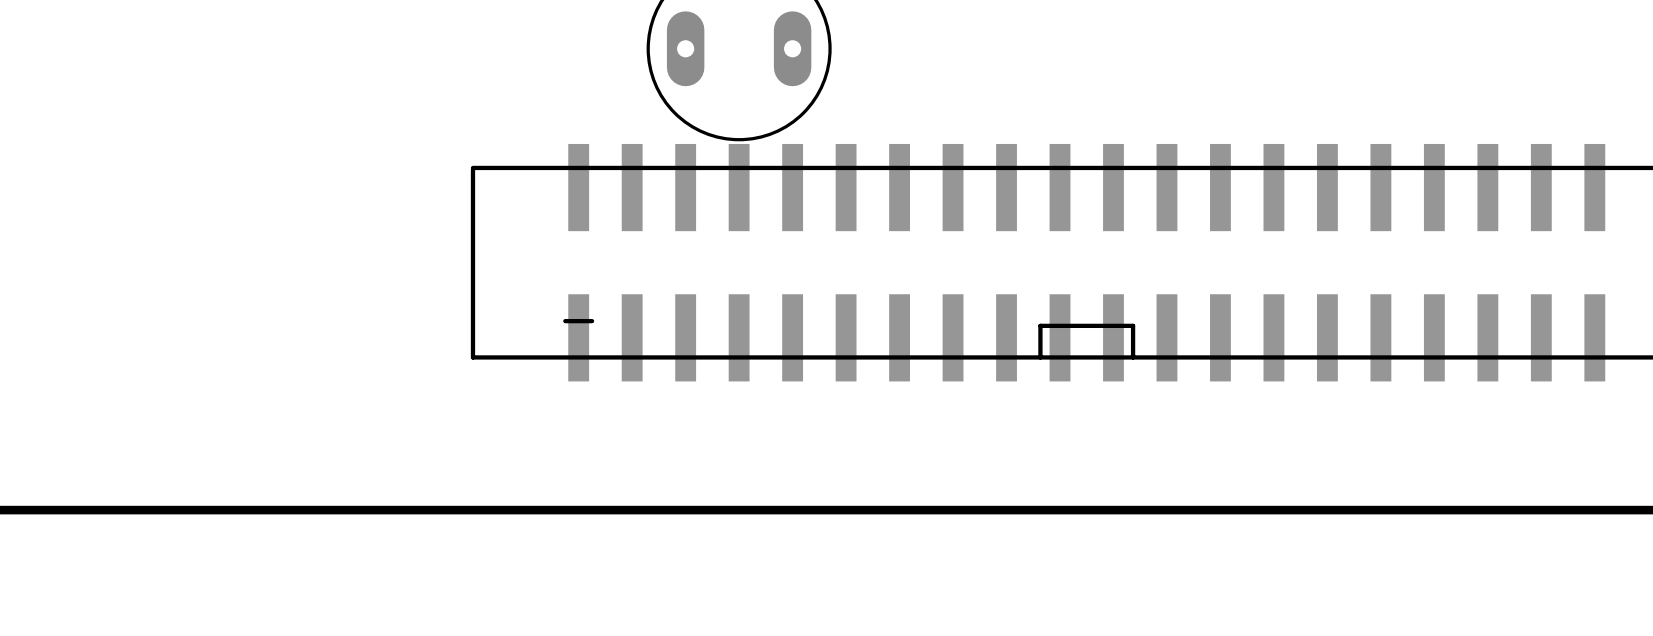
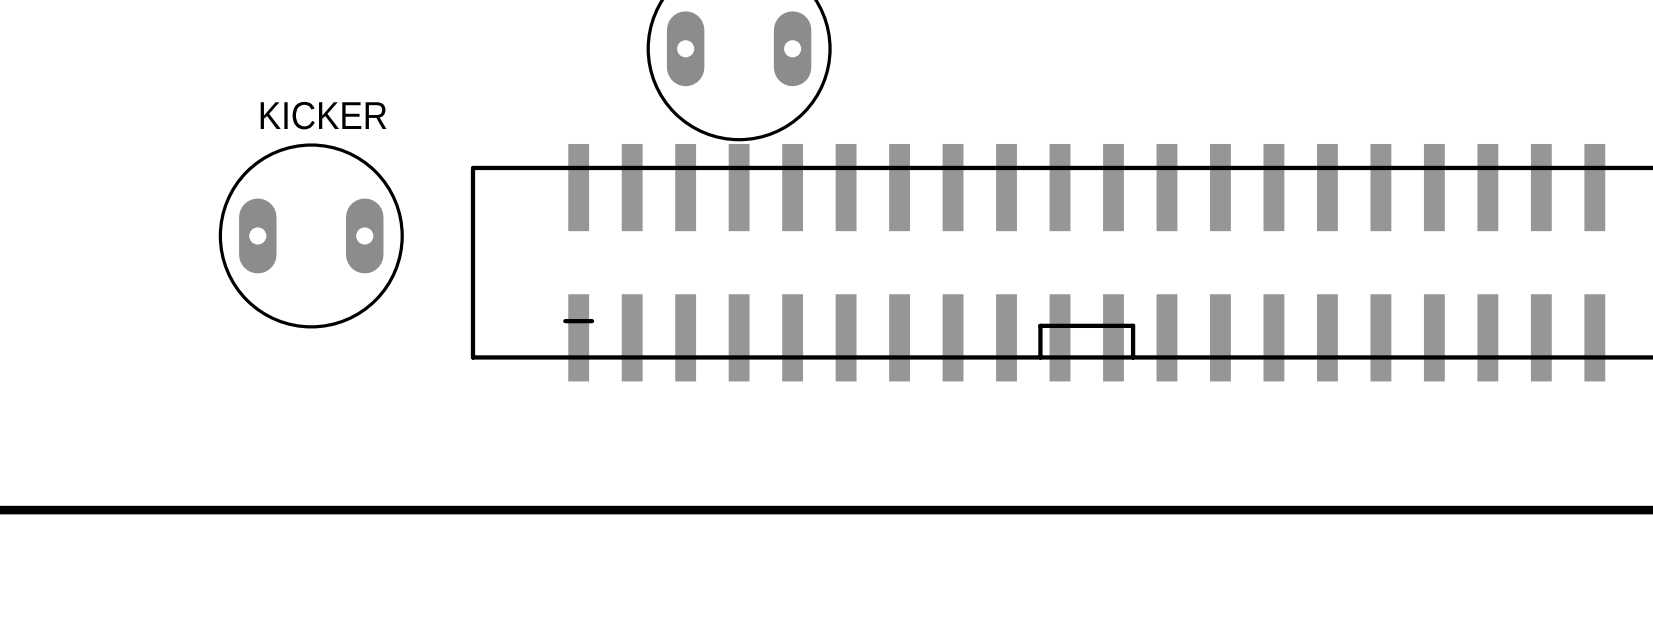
KICKER: none -> (311, 235)

